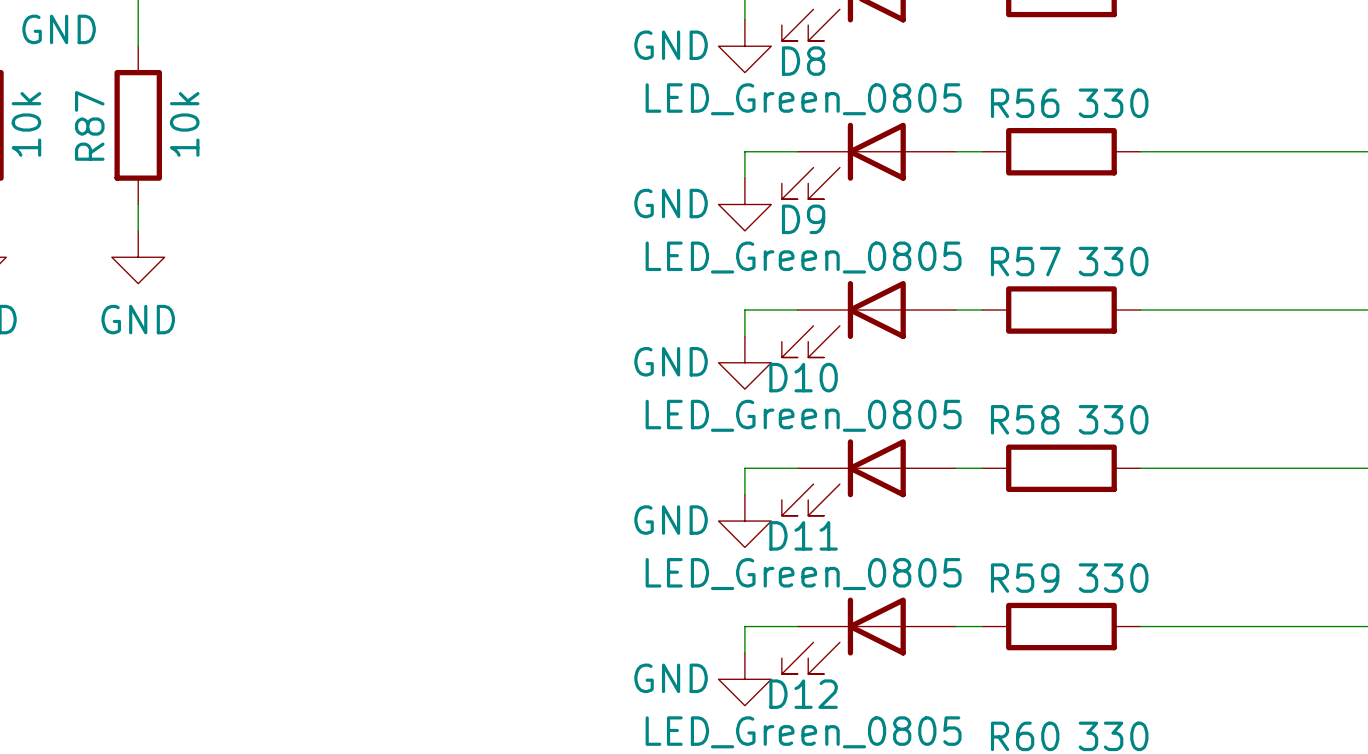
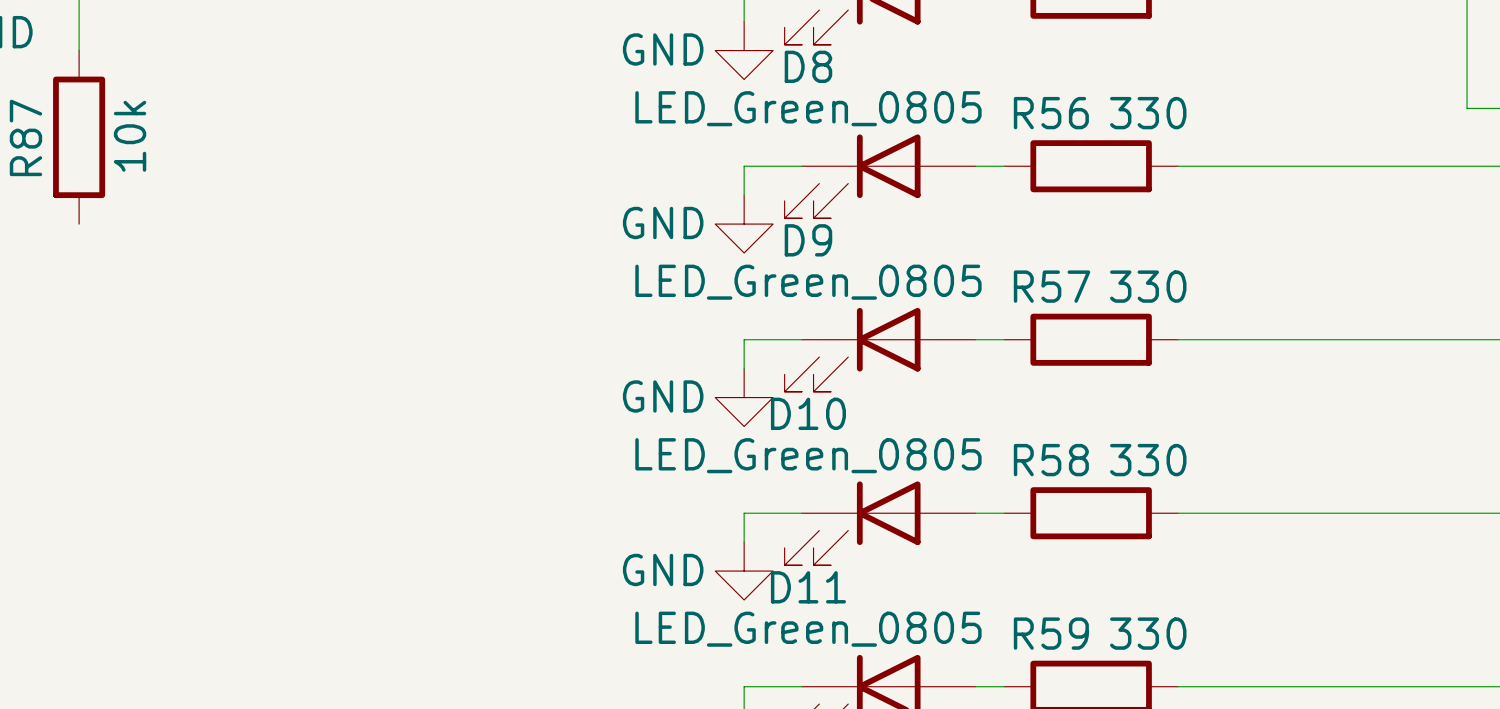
wire: (138, 204) (138, 230) -> none
power symbol: GND (138, 257) -> none

